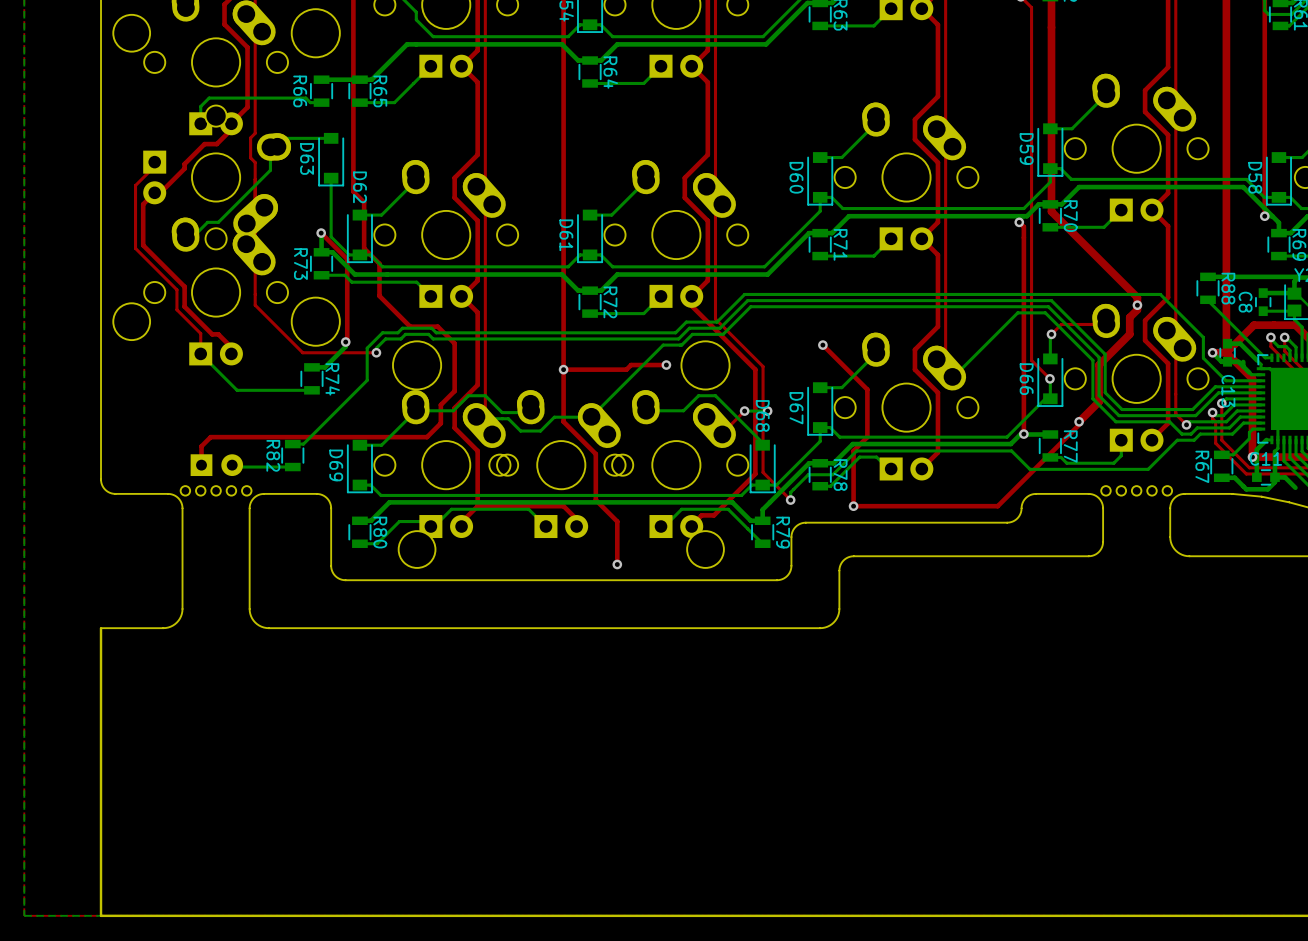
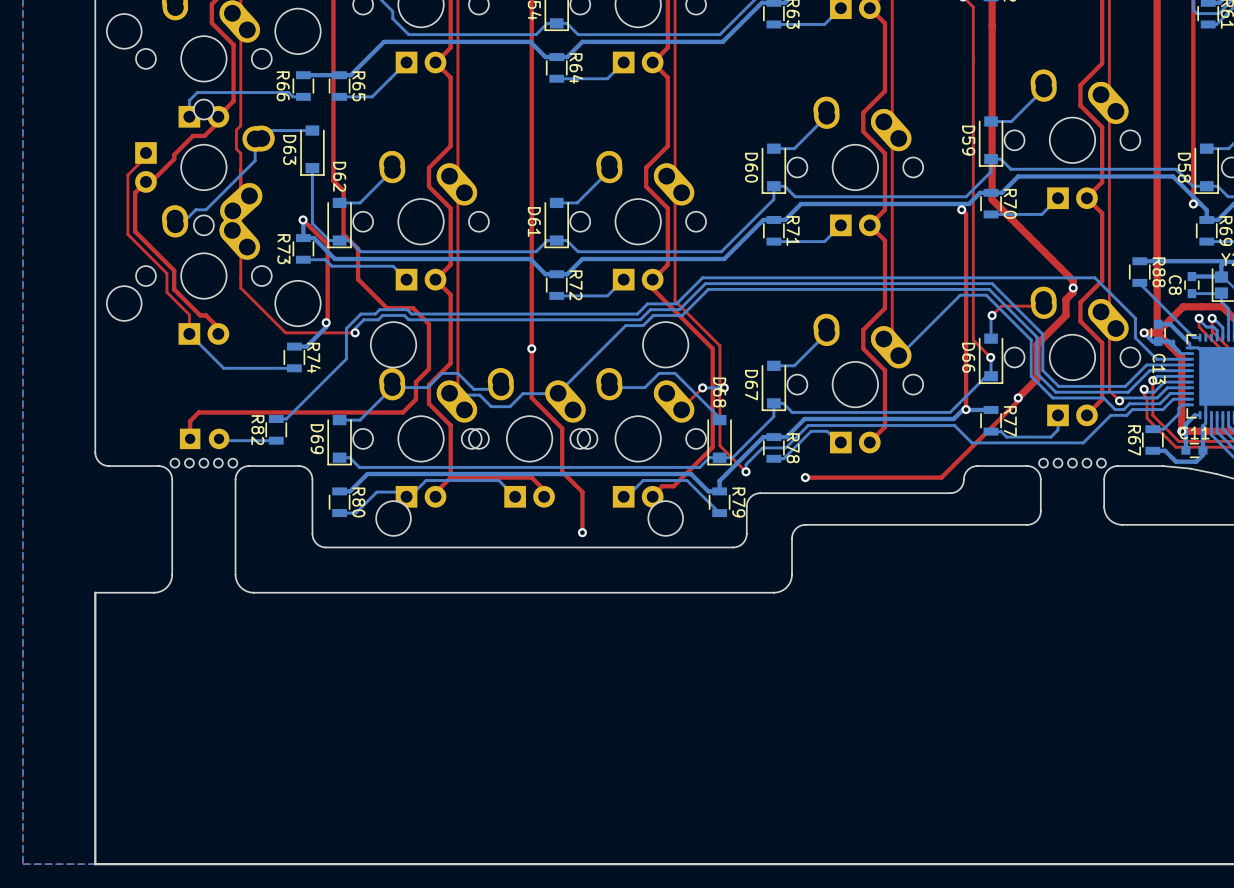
top track: (822, 345) (867, 389) (867, 437) (853, 450) (853, 506) -> none
via: (822, 345) -> none
top track: (666, 365) (631, 365) (626, 369) (563, 369) -> none
via: (666, 365) -> none
bottom track: (1274, 477) (1285, 477) (1295, 487) -> none

